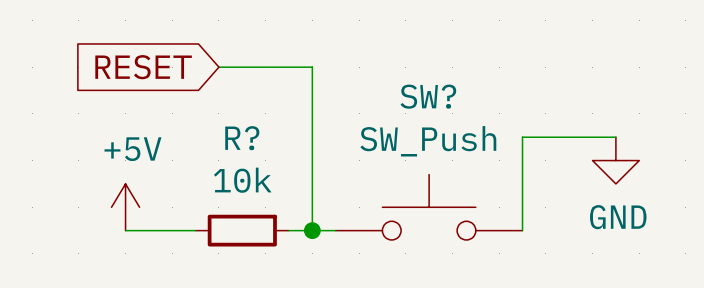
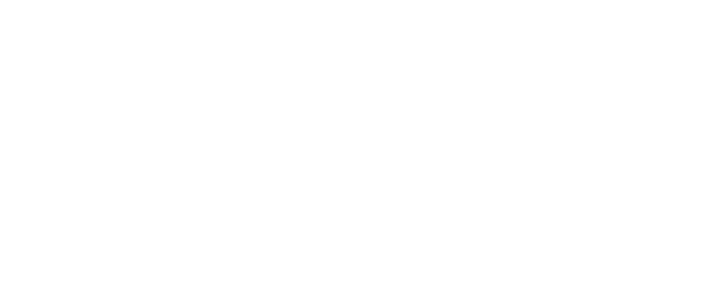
global label: RESET (143, 67) -> none
wire: (218, 67) (312, 67) (312, 230) -> none
wire: (615, 137) (522, 137) (522, 230) -> none
power symbol: GND (615, 160) -> none
power symbol: +5V (125, 207) -> none
SW?: SW_Push (429, 207) -> none
wire: (125, 230) (195, 230) -> none
R?: 10k (242, 230) -> none
wire: (289, 230) (335, 230) -> none
junction: (312, 230) -> none

